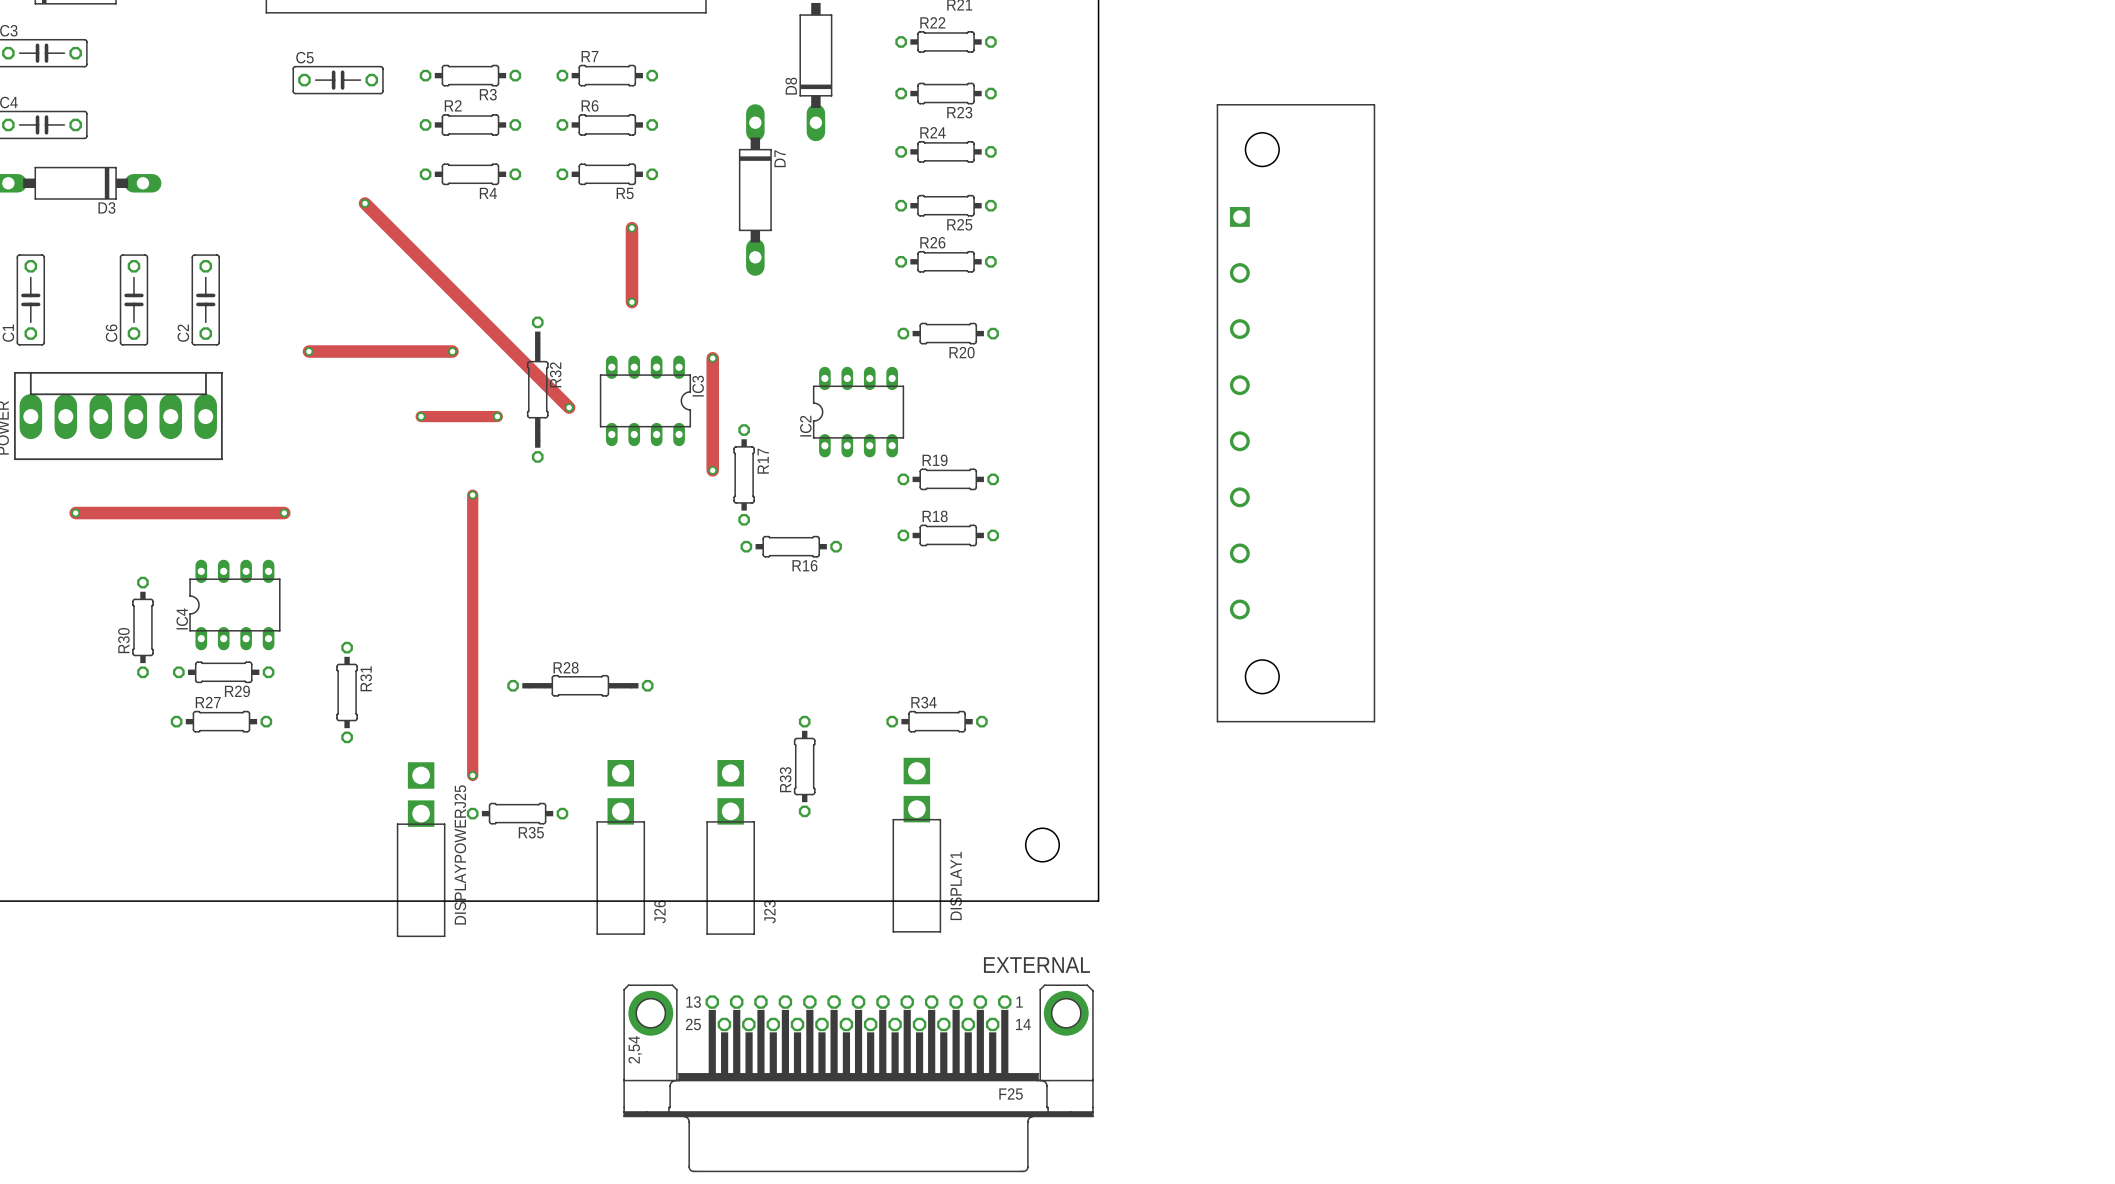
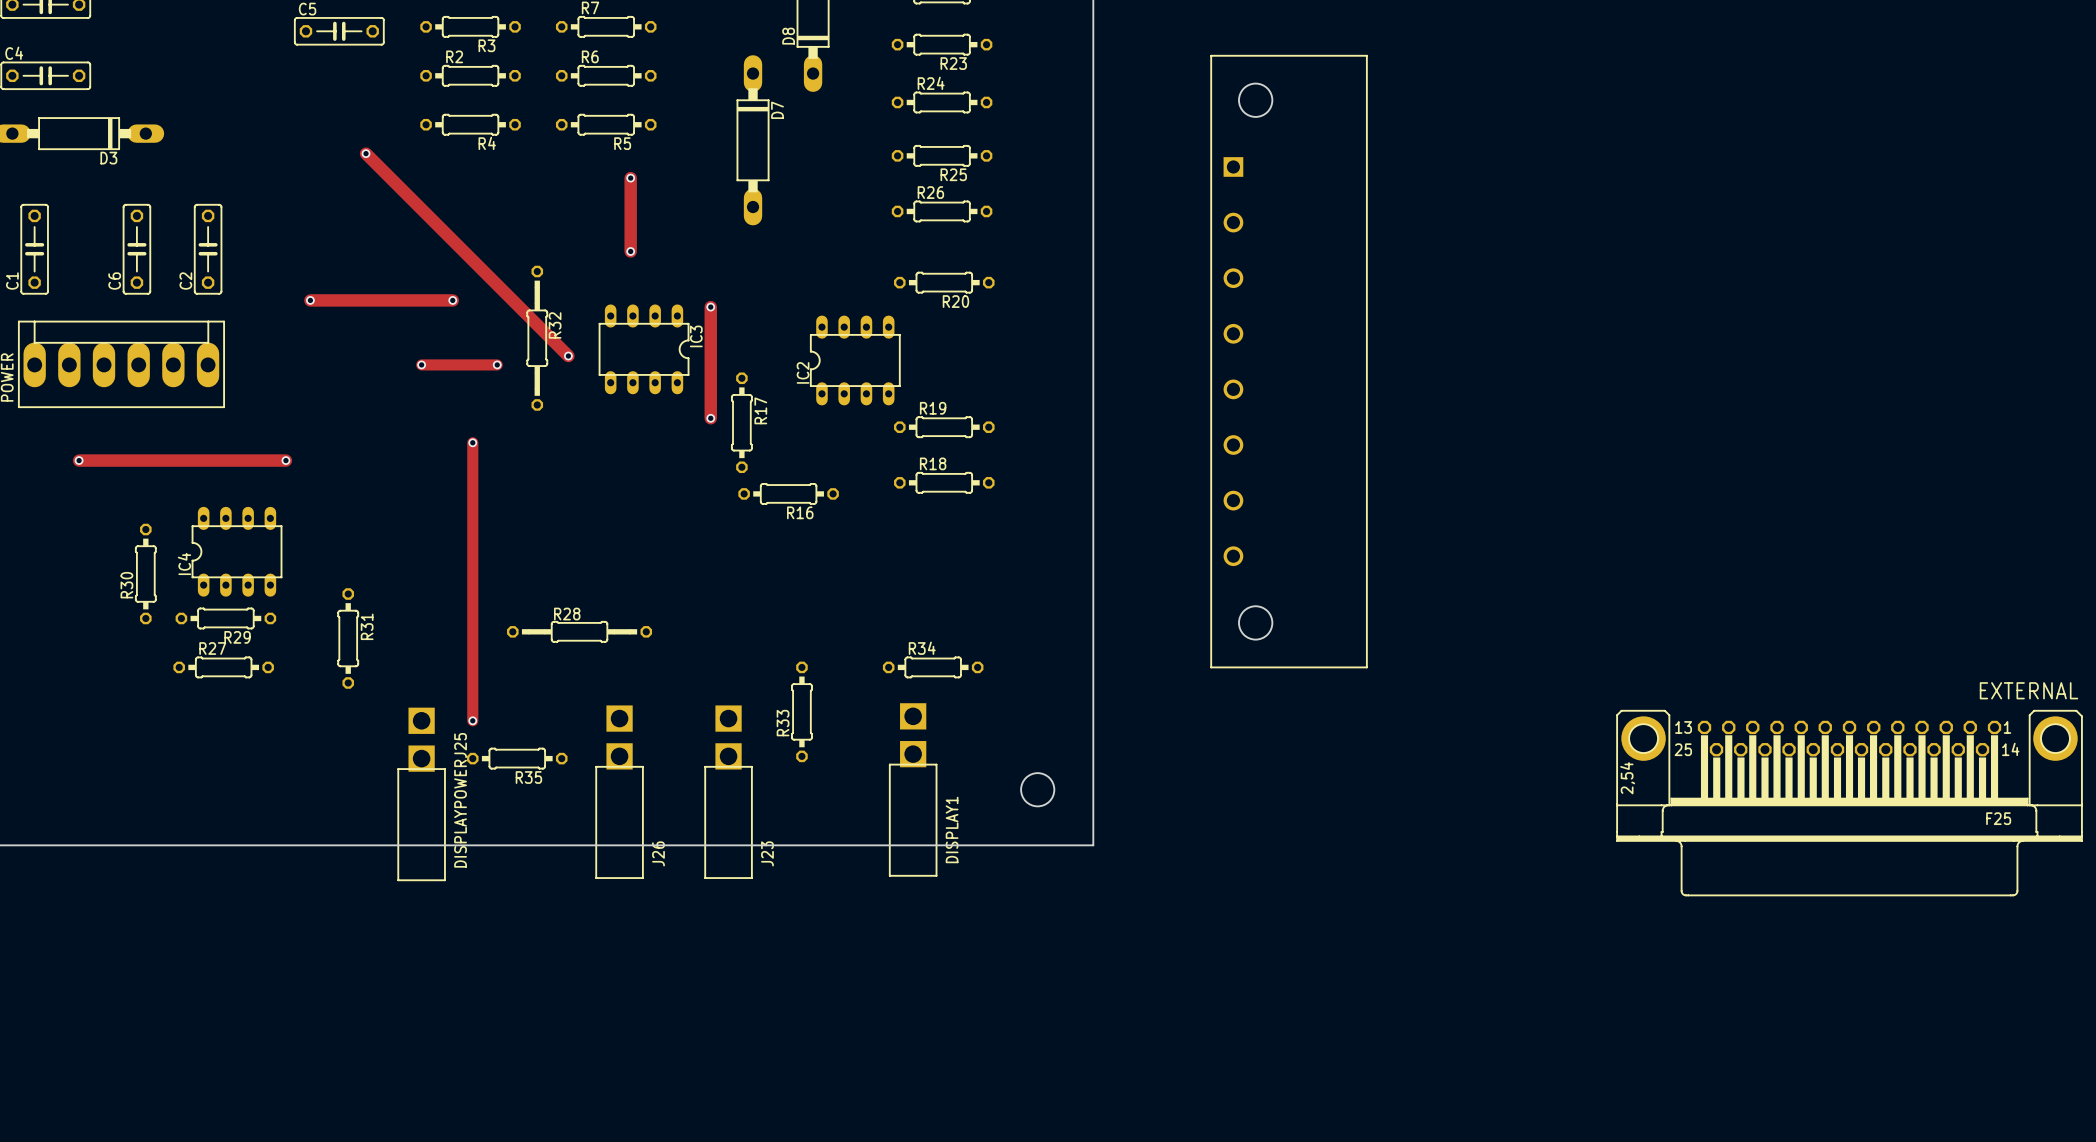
EXTERNAL: none -> (1849, 803)
EXTERNAL: (858, 1078) -> none

